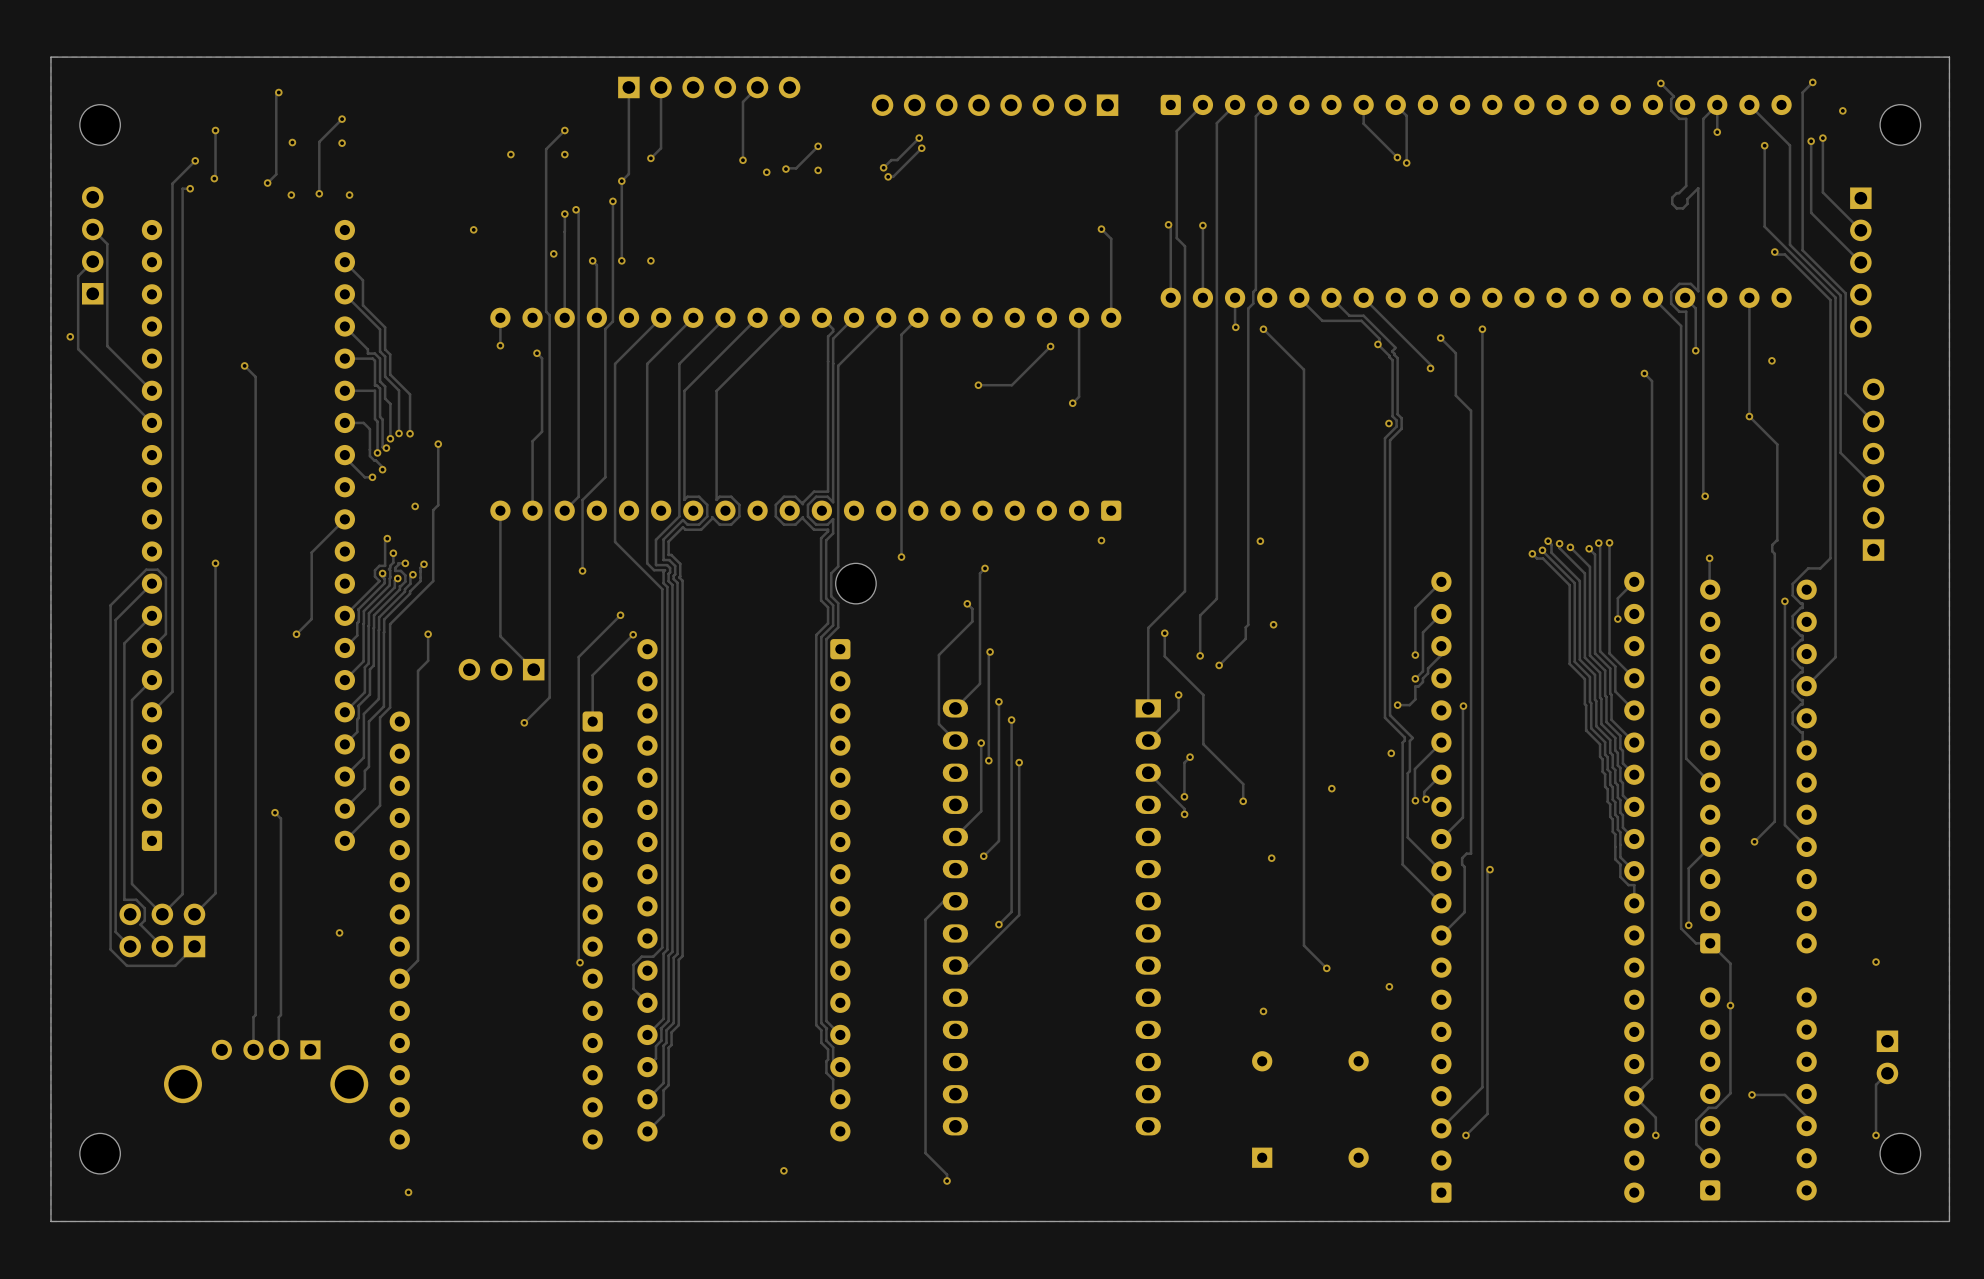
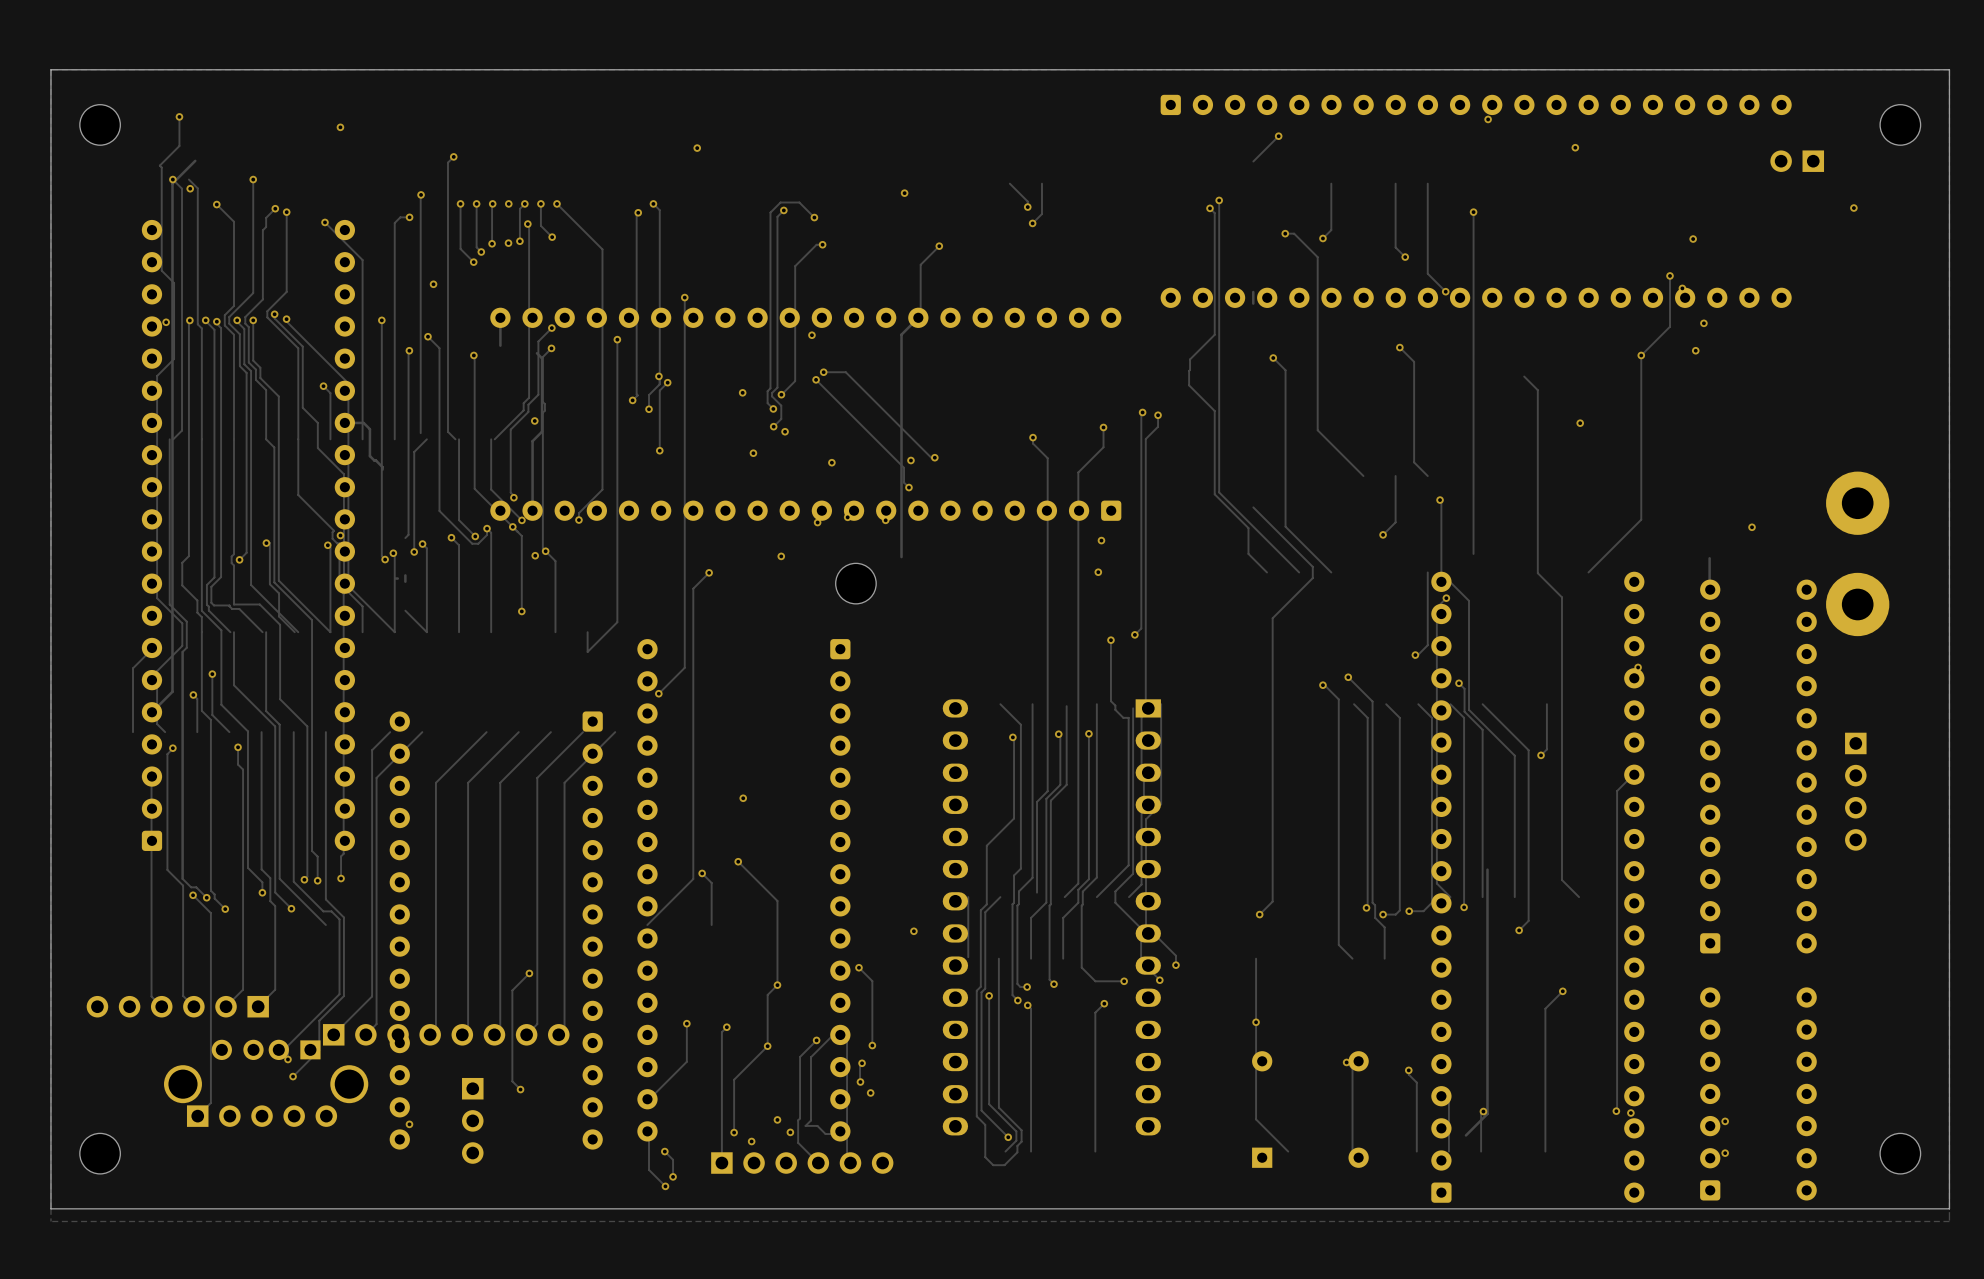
board edge: (1949, 69) (1949, 57) (50, 57) (50, 69) -> (1949, 69) (50, 69)
track: (1812, 82) (1802, 92) (1802, 250) (1845, 293) (1845, 393) (1873, 421) -> none
via: (1812, 82) -> none
track: (1660, 83) (1673, 96) (1671, 99) (1671, 110) (1679, 118) (1686, 118) (1686, 185) (1672, 197) (1672, 203) (1676, 208) (1683, 208) (1687, 203) (1687, 199) (1698, 188) (1698, 291) (1690, 283) (1679, 283) (1671, 292) (1671, 303) (1679, 311) (1686, 311) (1686, 758) (1710, 782) -> none
via: (1660, 83) -> none
track: (628, 87) (628, 174) (621, 181) (621, 260) -> none
track: (661, 87) (661, 148) (650, 158) -> none
part: (709, 87) -> none
track: (757, 87) (742, 101) (742, 160) -> none
track: (278, 92) (276, 95) (276, 174) (267, 183) -> none
via: (278, 92) -> none
track: (1202, 104) (1176, 131) (1176, 238) (1185, 246) (1185, 591) (1148, 627) (1148, 708) -> none
track: (1235, 104) (1216, 123) (1216, 598) (1200, 615) (1200, 655) -> none
track: (1267, 104) (1255, 116) (1255, 289) (1253, 292) -> none
track: (1363, 104) (1363, 123) (1397, 157) -> none
track: (1395, 104) (1406, 115) (1406, 163) -> none
track: (1749, 104) (1789, 145) (1789, 244) (1840, 295) (1840, 452) (1873, 485) -> none
part: (995, 105) -> none
via: (1842, 110) -> none
track: none -> (179, 116) (179, 146) (159, 165) (161, 167) (161, 270) (174, 283) (174, 359) (157, 376) (157, 598) (182, 623) (182, 645) (157, 671) (157, 724) (165, 732)
via: none -> (179, 116)
track: (342, 119) (319, 141) (319, 193) -> none
via: (342, 119) -> none
via: none -> (1488, 119)
via: none -> (340, 127)
track: (215, 130) (214, 178) -> none
via: (215, 130) -> none
track: (564, 130) (546, 149) (546, 311) (549, 315) (549, 697) (524, 722) -> none
via: (564, 130) -> none
track: (1717, 132) (1717, 104) (1703, 118) (1703, 494) (1705, 496) -> none
via: (1717, 132) -> none
track: none -> (1278, 136) (1253, 161)
via: none -> (1278, 136)
track: (919, 138) (897, 160) (891, 160) (883, 167) -> none
via: (919, 138) -> none
track: (1822, 138) (1822, 192) (1860, 230) -> none
via: (1822, 138) -> none
track: (1811, 141) (1811, 212) (1860, 262) -> none
via: (1811, 141) -> none
via: (292, 142) -> none
via: (342, 143) -> none
track: (1764, 145) (1764, 226) (1835, 297) (1835, 657) (1806, 686) -> none
via: (1764, 145) -> none
track: (818, 146) (796, 168) (785, 169) -> none
via: (818, 146) -> none
via: none -> (1575, 147)
via: none -> (697, 148)
track: (921, 148) (893, 176) (888, 176) -> none
via: (921, 148) -> none
via: (510, 154) -> none
via: (564, 154) -> none
track: none -> (453, 156) (447, 162) (447, 431) (455, 439)
via: none -> (453, 156)
via: (1397, 157) -> none
via: (650, 158) -> none
via: (195, 160) -> none
via: (742, 160) -> none
part: none -> (1797, 161)
via: (1406, 163) -> none
via: (883, 167) -> none
via: (785, 169) -> none
via: (818, 170) -> none
via: (766, 172) -> none
via: (888, 176) -> none
via: (214, 178) -> none
track: none -> (172, 179) (182, 188) (182, 430) (173, 439)
via: none -> (172, 179)
track: none -> (188, 179) (197, 188) (197, 324) (201, 328) (201, 610) (221, 630) (221, 704) (247, 731) (247, 867) (262, 882) (262, 892)
track: none -> (253, 179) (253, 293) (229, 317) (229, 323) (239, 334) (239, 366) (246, 372) (246, 552) (239, 559)
via: none -> (253, 179)
via: (621, 181) -> none
via: (267, 183) -> none
track: none -> (1009, 183) (1027, 201) (1027, 207)
track: none -> (1041, 183) (1041, 214) (1032, 223)
track: none -> (1331, 183) (1331, 230) (1322, 238)
track: none -> (1395, 183) (1395, 247) (1405, 257)
track: none -> (1427, 183) (1427, 273) (1445, 291)
track: (190, 188) (182, 188) (182, 651) -> (169, 439) (169, 604) (186, 621) (186, 647) (182, 651)
via: (319, 193) -> none
via: none -> (904, 193)
track: none -> (421, 194) (420, 433)
via: none -> (421, 194)
via: (291, 195) -> none
via: (349, 195) -> none
track: none -> (1219, 200) (1219, 492) (1299, 572)
via: none -> (1219, 200)
track: (612, 201) (612, 321) (605, 329) (605, 477) (582, 500) (582, 570) -> none
via: (612, 201) -> none
track: none -> (460, 203) (460, 248) (473, 262)
via: none -> (460, 203)
track: none -> (476, 203) (476, 247) (481, 252)
via: none -> (476, 203)
track: none -> (492, 203) (492, 243)
via: none -> (492, 203)
via: none -> (508, 203)
track: none -> (524, 203) (519, 208) (519, 241)
via: none -> (524, 203)
track: none -> (540, 203) (540, 225) (552, 237)
via: none -> (540, 203)
track: none -> (556, 203) (602, 249) (602, 489) (578, 513) (578, 520)
via: none -> (556, 203)
track: none -> (653, 203) (659, 210) (659, 384) (649, 395) (649, 409)
via: none -> (653, 203)
track: none -> (216, 204) (234, 221) (234, 306) (224, 315) (224, 325) (234, 334) (234, 554) (231, 556) (231, 563) (234, 565) (234, 604) (259, 604) (280, 624) (280, 699) (307, 726) (307, 876) (304, 879)
via: none -> (216, 204)
via: none -> (1027, 207)
track: none -> (275, 208) (266, 217) (266, 227) (262, 230) (262, 299) (245, 317) (245, 323) (248, 327) (248, 362) (255, 369) (255, 379) (266, 390) (266, 439) (274, 447) (274, 582) (312, 620) (312, 850) (317, 856) (317, 880)
via: none -> (275, 208)
track: none -> (1210, 208) (1214, 213) (1214, 334) (1190, 359) (1189, 385) (1214, 410) (1214, 494) (1248, 528) (1248, 553) (1267, 572)
via: none -> (1210, 208)
via: none -> (1853, 208)
track: (576, 209) (578, 212) (578, 496) (564, 510) -> none
via: (576, 209) -> none
track: none -> (783, 210) (777, 216) (777, 387) (772, 393) (772, 396) (781, 405) (781, 419) (773, 426)
via: none -> (783, 210)
track: none -> (286, 212) (286, 291) (267, 311) (267, 317) (298, 348) (298, 495) (334, 530) (332, 538) (339, 543) (339, 589) (343, 593) (343, 853) (341, 856) (341, 878)
via: none -> (286, 212)
track: none -> (638, 212) (636, 214) (637, 395) (632, 400)
via: none -> (638, 212)
track: none -> (1473, 212) (1473, 553)
via: none -> (1473, 212)
track: (564, 214) (564, 231) -> none
via: (564, 214) -> none
track: none -> (409, 217) (400, 217) (394, 222) (394, 439)
via: none -> (409, 217)
track: none -> (814, 217) (799, 202) (780, 202) (770, 212) (770, 388) (767, 391) (767, 403) (773, 408)
via: none -> (814, 217)
track: none -> (325, 222) (362, 260) (362, 439)
via: none -> (325, 222)
via: none -> (1032, 223)
track: none -> (527, 224) (529, 397) (523, 403) (523, 410) (494, 439)
via: none -> (527, 224)
track: (1168, 224) (1170, 227) (1170, 297) -> none
via: (1168, 224) -> none
track: (1202, 225) (1202, 297) -> none
via: (1202, 225) -> none
track: (92, 229) (107, 244) (107, 346) (151, 390) -> none
via: (473, 229) -> none
track: (1101, 229) (1111, 238) (1111, 317) -> none
via: (1101, 229) -> none
track: (564, 231) (564, 317) -> none
track: none -> (1285, 233) (1294, 233) (1317, 257) (1317, 430) (1363, 476)
via: none -> (1285, 233)
via: none -> (552, 237)
via: none -> (1322, 238)
via: none -> (1693, 239)
via: none -> (519, 241)
via: none -> (492, 243)
via: none -> (508, 243)
track: none -> (822, 244) (816, 244) (795, 266) (795, 381) (781, 394)
via: none -> (822, 244)
part: (92, 245) -> none
track: none -> (939, 246) (920, 264) (920, 310)
via: none -> (939, 246)
via: none -> (481, 252)
track: (1774, 252) (1777, 254) (1784, 254) (1830, 300) (1830, 558) (1820, 568) (1808, 568) (1792, 583) (1792, 595) (1802, 603) (1802, 607) (1792, 616) (1792, 627) (1802, 635) (1802, 640) (1792, 648) (1792, 659) (1802, 667) (1802, 672) (1792, 680) (1792, 691) (1802, 700) (1802, 704) (1792, 712) (1792, 724) (1802, 732) (1802, 746) (1806, 750) -> none
via: (1774, 252) -> none
via: (553, 253) -> none
via: none -> (1405, 257)
track: (592, 260) (596, 265) (596, 317) -> none
via: (592, 260) -> none
via: (621, 260) -> none
via: (650, 260) -> none
track: (92, 261) (78, 276) (78, 349) (151, 422) -> none
track: (344, 262) (362, 280) (362, 305) (385, 327) (385, 349) (390, 354) (390, 374) (410, 394) (410, 433) -> none
via: none -> (473, 262)
part: (1860, 262) -> none
track: none -> (1670, 275) (1670, 326) (1641, 355) (1641, 519) (1588, 572)
via: none -> (1670, 275)
via: none -> (433, 284)
via: none -> (1682, 288)
via: none -> (1445, 291)
track: (344, 294) (380, 329) (380, 351) (385, 356) (385, 376) (399, 390) (399, 433) -> none
track: none -> (684, 297) (684, 667) (658, 693)
via: none -> (684, 297)
track: (1235, 297) (1235, 327) -> none
track: (1299, 297) (1322, 320) (1361, 320) (1379, 338) (1377, 344) (1392, 360) (1392, 416) (1396, 420) (1396, 426) (1384, 438) (1384, 717) (1404, 737) (1402, 742) (1402, 864) (1441, 903) -> none
track: (1331, 297) (1349, 315) (1363, 315) (1395, 347) (1392, 351) (1397, 358) (1397, 414) (1401, 418) (1401, 428) (1390, 440) (1390, 715) (1412, 738) (1409, 740) (1409, 771) (1407, 773) (1407, 837) (1441, 871) -> none
track: (1363, 297) (1432, 366) (1430, 368) -> none
track: (1652, 297) (1681, 325) (1681, 928) (1695, 943) (1710, 943) (1730, 963) (1730, 1093) (1715, 1107) (1708, 1107) (1696, 1120) (1696, 1144) (1710, 1158) -> none
track: (1685, 297) (1695, 308) (1695, 350) -> none
track: (1749, 297) (1749, 416) (1777, 444) (1777, 540) (1772, 545) (1772, 551) (1774, 553) (1774, 821) (1754, 841) -> none
track: (1253, 303) (1248, 308) (1248, 624) (1245, 627) (1245, 638) (1219, 665) -> none
track: none -> (274, 314) (274, 318) (302, 346) (302, 407) (317, 422) (317, 448) (343, 474) (343, 587) (362, 606) (362, 632)
via: none -> (274, 314)
track: (661, 317) (615, 363) (615, 541) (662, 589) (662, 947) (653, 956) (641, 956) (633, 964) (633, 988) (647, 1002) -> none
track: (693, 317) (647, 363) (647, 563) (654, 570) (665, 570) (663, 583) (667, 587) (667, 949) (663, 953) (663, 1018) (647, 1034) -> none
track: (725, 317) (679, 363) (679, 516) (655, 539) (655, 564) (667, 565) (670, 568) (668, 581) (672, 584) (672, 951) (668, 955) (668, 1020) (660, 1028) (661, 1040) (655, 1046) (655, 1058) (647, 1067) -> none
track: (757, 317) (684, 390) (684, 499) (687, 496) (699, 496) (707, 504) (707, 516) (699, 524) (687, 524) (682, 520) (663, 539) (663, 560) (669, 560) (675, 565) (673, 579) (677, 582) (677, 953) (673, 957) (673, 1023) (666, 1030) (666, 1042) (663, 1045) (663, 1083) (647, 1099) -> none
track: (789, 317) (716, 390) (716, 499) (719, 496) (731, 496) (739, 504) (739, 516) (731, 524) (719, 524) (712, 517) (701, 529) (685, 529) (682, 527) (668, 541) (668, 554) (671, 554) (680, 563) (679, 577) (682, 580) (682, 956) (678, 959) (678, 1025) (671, 1032) (671, 1044) (668, 1047) (668, 1085) (663, 1090) (663, 1115) (647, 1131) -> none
track: (821, 317) (833, 329) (828, 336) (828, 491) (814, 491) (802, 504) (795, 496) (783, 496) (775, 504) (775, 516) (783, 524) (795, 524) (802, 517) (814, 529) (828, 529) (821, 538) (821, 600) (828, 607) (828, 623) (816, 635) (816, 1025) (821, 1030) (821, 1042) (828, 1049) (826, 1072) (833, 1079) (833, 1092) (840, 1099) -> none
track: (854, 317) (833, 338) (833, 502) (827, 496) (816, 496) (807, 504) (807, 516) (816, 524) (827, 524) (833, 519) (833, 533) (826, 540) (826, 598) (833, 605) (833, 625) (821, 637) (821, 1023) (826, 1028) (826, 1040) (833, 1047) (833, 1059) (840, 1067) -> none
track: (886, 317) (838, 365) (838, 566) (831, 573) (831, 596) (838, 603) (838, 627) (826, 639) (826, 1021) (840, 1034) -> none
track: (1079, 317) (1079, 396) (1072, 403) -> none
track: none -> (286, 319) (286, 321) (348, 383) (348, 585) (394, 632) (395, 551)
via: none -> (286, 319)
track: none -> (189, 320) (188, 556) (182, 562) (182, 585) (197, 600) (197, 612) (201, 617) (201, 710) (210, 719) (210, 890) (214, 894) (214, 898) (225, 909)
via: none -> (189, 320)
track: none -> (205, 320) (214, 329) (214, 577) (206, 584) (206, 604) (208, 610) (230, 632)
via: none -> (205, 320)
track: none -> (237, 320) (244, 328) (244, 364) (251, 371) (251, 584) (298, 632)
via: none -> (237, 320)
track: none -> (253, 320) (253, 360) (260, 367) (260, 378) (278, 396) (278, 580) (330, 632) (330, 547) (327, 545)
via: none -> (253, 320)
track: none -> (381, 320) (381, 556) (385, 559)
via: none -> (381, 320)
track: none -> (216, 321) (221, 328) (221, 577) (211, 586) (211, 602) (213, 605) (229, 605) (232, 608) (239, 608) (262, 632)
via: none -> (216, 321)
via: none -> (166, 322)
via: none -> (1703, 323)
track: (344, 326) (367, 349) (367, 353) (374, 353) (380, 358) (380, 381) (385, 386) (385, 398) (390, 403) (390, 438) -> none
via: (1235, 327) -> none
track: none -> (551, 328) (538, 341) (538, 394) (528, 404) (528, 411) (510, 429) (510, 492) (513, 497)
via: none -> (551, 328)
track: (1263, 329) (1303, 369) (1303, 945) (1326, 968) -> none
via: (1263, 329) -> none
track: (1482, 329) (1482, 1087) (1441, 1128) -> none
via: (1482, 329) -> none
via: none -> (811, 335)
via: (70, 336) -> none
track: none -> (427, 336) (439, 348) (439, 510) (472, 543) (478, 543) (487, 535) (487, 528) (491, 532) (491, 632)
via: none -> (427, 336)
track: (1440, 338) (1455, 353) (1455, 395) (1471, 410) (1471, 853) (1466, 853) (1462, 858) (1462, 864) (1464, 867) (1464, 912) (1441, 935) -> none
via: (1440, 338) -> none
track: none -> (617, 339) (617, 622) (587, 651) (587, 632)
via: none -> (617, 339)
via: (1377, 344) -> none
via: (500, 345) -> none
track: (1050, 346) (1011, 385) (978, 385) -> none
via: (1050, 346) -> none
track: none -> (1399, 347) (1414, 361) (1414, 462) (1427, 476)
via: none -> (1399, 347)
track: none -> (551, 348) (542, 357) (542, 402) (544, 404) (544, 410) (542, 412) (542, 548) (555, 561) (555, 632)
via: none -> (551, 348)
track: none -> (409, 350) (408, 534) (405, 538)
via: none -> (409, 350)
via: (536, 353) -> none
track: none -> (473, 355) (474, 488) (521, 535) (521, 611)
via: none -> (473, 355)
track: (344, 358) (372, 358) (374, 360) (374, 385) (380, 388) (382, 447) (386, 448) -> none
track: none -> (1273, 358) (1285, 370) (1285, 526) (1331, 572)
via: none -> (1273, 358)
via: (1771, 360) -> none
track: (244, 365) (255, 376) (255, 1015) (253, 1017) (253, 1049) -> none
via: (244, 365) -> none
via: (1430, 368) -> none
track: none -> (823, 372) (845, 372) (931, 458) (934, 457)
via: none -> (823, 372)
track: (1644, 373) (1652, 381) (1652, 1078) (1634, 1096) (1655, 1117) (1655, 1135) -> none
via position: (1644, 373) -> (1641, 355)
via: none -> (658, 376)
track: none -> (1524, 376) (1537, 390) (1537, 573) (1561, 597) (1561, 880) (1579, 897)
track: none -> (816, 379) (904, 467) (904, 482) (908, 487)
via: none -> (816, 379)
track: none -> (667, 382) (659, 390) (659, 450)
via: none -> (667, 382)
via: (978, 385) -> none
track: none -> (323, 386) (330, 393) (330, 439)
via: none -> (323, 386)
track: (344, 390) (374, 390) (377, 452) -> none
via: none -> (742, 392)
via: none -> (781, 394)
via: none -> (632, 400)
via: (1072, 403) -> none
via: none -> (773, 408)
via: none -> (649, 409)
track: none -> (1142, 412) (1141, 628) (1134, 634)
via: none -> (1142, 412)
track: none -> (1158, 415) (1158, 426) (1145, 439) (1145, 713) (1141, 717) (1141, 764) (1143, 767) (1141, 884) (1129, 897)
via: none -> (1158, 415)
via: (1749, 416) -> none
via: none -> (534, 420)
via: (1388, 423) -> none
via: none -> (1580, 423)
via: none -> (773, 426)
track: none -> (1103, 427) (1103, 447) (1078, 472) (1078, 883) (1064, 897)
via: none -> (1103, 427)
via: none -> (785, 431)
via: (399, 433) -> none
via: (410, 433) -> none
track: none -> (1033, 437) (1033, 443) (1047, 458) (1047, 791) (1037, 801) (1037, 892)
via: none -> (1033, 437)
via: (390, 438) -> none
track: none -> (426, 439) (414, 451) (414, 551)
track: none -> (459, 439) (459, 520) (475, 536)
track: none -> (491, 439) (491, 489) (521, 520)
track: (438, 444) (438, 505) (433, 510) (433, 581) (390, 624) (390, 707) (380, 717) (380, 805) (344, 840) -> none
via: (438, 444) -> none
via: (386, 448) -> none
via: none -> (659, 450)
via: (377, 452) -> none
via: none -> (753, 453)
track: (344, 455) (364, 477) (372, 477) -> none
via: none -> (934, 457)
via: none -> (910, 460)
via: none -> (831, 462)
via: (382, 469) -> none
part: (1873, 469) -> none
track: none -> (1395, 476) (1395, 522) (1383, 534)
via: (372, 477) -> none
via: none -> (908, 487)
via: (1705, 496) -> none
via: none -> (513, 497)
track: none -> (1440, 500) (1441, 573) (1469, 600) (1469, 709) (1514, 755) (1514, 897)
via: none -> (1440, 500)
part: none -> (1857, 503)
via: (415, 506) -> none
track: none -> (1253, 507) (1312, 566) (1312, 578) (1272, 618) (1272, 901) (1259, 914)
track: (500, 510) (500, 636) (533, 669) -> none
via: none -> (847, 517)
track: (344, 519) (311, 552) (311, 619) (296, 634) -> none
via: none -> (521, 520)
via: none -> (578, 520)
via: none -> (885, 520)
via: none -> (817, 522)
via: none -> (512, 526)
via: none -> (1752, 527)
via: none -> (487, 528)
via: none -> (1383, 534)
via: none -> (340, 535)
via: none -> (475, 536)
track: none -> (451, 537) (459, 545) (459, 632)
via: none -> (451, 537)
track: (387, 538) (385, 540) (385, 565) (379, 565) (374, 570) (374, 576) (379, 581) -> none
via: (387, 538) -> none
via: (1260, 541) -> none
track: (1548, 541) (1551, 544) (1551, 552) (1579, 581) (1579, 659) (1595, 674) (1596, 726) (1610, 740) (1610, 752) (1612, 755) (1612, 767) (1615, 770) (1615, 782) (1617, 785) (1620, 812) (1622, 815) (1622, 827) (1634, 839) -> none
via: (1548, 541) -> none
track: (1609, 542) (1609, 653) (1634, 678) -> none
via: (1609, 542) -> none
track: none -> (266, 543) (269, 543) (269, 584) (279, 593) (279, 616) (294, 632)
via: none -> (266, 543)
track: (1559, 543) (1559, 548) (1584, 573) (1584, 657) (1600, 672) (1601, 724) (1615, 738) (1615, 750) (1617, 753) (1622, 795) (1634, 806) -> none
via: (1559, 543) -> none
track: (1598, 543) (1600, 651) (1615, 666) (1615, 691) (1634, 710) -> none
via: (1598, 543) -> none
track: none -> (422, 544) (426, 548) (426, 632) (405, 610)
via: none -> (422, 544)
via: none -> (327, 545)
track: (1570, 547) (1589, 566) (1589, 655) (1605, 670) (1606, 721) (1620, 735) (1622, 763) (1634, 774) -> none
via: (1570, 547) -> none
track: (1589, 548) (1595, 554) (1595, 653) (1610, 668) (1611, 719) (1634, 742) -> none
via: (1589, 548) -> none
track: (1542, 550) (1574, 583) (1574, 661) (1589, 677) (1591, 728) (1605, 742) (1610, 784) (1612, 787) (1612, 799) (1615, 802) (1615, 814) (1617, 817) (1617, 829) (1620, 832) (1620, 857) (1634, 871) -> none
via: (1542, 550) -> none
via: none -> (414, 551)
via: none -> (545, 551)
track: (393, 553) (393, 562) (389, 569) (389, 585) (363, 611) (363, 661) (344, 680) -> none
track: (1532, 553) (1537, 558) (1543, 558) (1569, 585) (1569, 663) (1584, 679) (1586, 730) -> none
via: (1532, 553) -> none
via: none -> (535, 555)
via: none -> (781, 556)
via: (901, 557) -> none
via: (1709, 558) -> none
via: none -> (385, 559)
track: (215, 563) (215, 893) (194, 914) -> none
via position: (215, 563) -> (239, 559)
track: (405, 563) (398, 563) (395, 570) (400, 570) (405, 575) -> none
via: (405, 563) -> none
track: (424, 564) (420, 567) (420, 581) (384, 619) (383, 706) (368, 721) (368, 766) (364, 770) (364, 788) (344, 808) -> none
via: (424, 564) -> none
track: (985, 568) (979, 573) (979, 683) (955, 708) -> none
via: (985, 568) -> none
via: (582, 570) -> none
track: none -> (709, 572) (693, 588) (693, 879) (647, 925)
via: none -> (709, 572)
via: none -> (1098, 572)
track: none -> (1427, 572) (1427, 645) (1414, 658)
track: (382, 573) (385, 576) (382, 576) (384, 583) (358, 609) (357, 635) (344, 647) -> none
via: (382, 573) -> none
track: (412, 574) (410, 577) (410, 583) (404, 591) (379, 617) (378, 699) (363, 713) (363, 757) (344, 776) -> none
via: (412, 574) -> none
track: (395, 578) (394, 587) (368, 613) (368, 663) (364, 667) (364, 692) (344, 712) -> none
via: (397, 578) -> none
track: (379, 581) (344, 615) -> none
track: (405, 581) (374, 615) (373, 665) (369, 669) (369, 694) (358, 705) (357, 732) (344, 744) -> none
track: (1441, 581) (1415, 607) (1415, 655) -> none
track: (1634, 581) (1617, 598) (1617, 619) -> none
track: (151, 583) (115, 620) (115, 931) (130, 946) -> none
track: none -> (1446, 598) (1436, 607) (1436, 883) (1450, 897)
via: none -> (1446, 598)
track: (1784, 601) (1784, 825) (1806, 846) -> none
via: (1784, 601) -> none
track: (967, 603) (972, 608) (972, 621) (938, 655) (938, 724) (955, 740) -> none
via: (967, 603) -> none
part: none -> (1857, 604)
via: none -> (521, 611)
track: (1441, 613) (1422, 632) (1422, 671) (1415, 678) -> none
track: (151, 615) (124, 643) (124, 899) (136, 899) (144, 908) (144, 920) (140, 924) (162, 946) -> none
track: (620, 615) (578, 657) (580, 962) -> none
via: (620, 615) -> none
via position: (1617, 619) -> (1638, 667)
via: (1273, 624) -> none
track: none -> (234, 632) (234, 685) (275, 726) (275, 892) (291, 908)
track: none -> (266, 632) (266, 711) (279, 724) (279, 878) (325, 925)
track: (1164, 633) (1164, 656) (1203, 694) (1203, 744) (1243, 784) (1243, 801) -> none
via: (1164, 633) -> none
via: (296, 634) -> none
track: (428, 634) (428, 660) (418, 670) (418, 960) (399, 978) -> none
via: (428, 634) -> none
track: (633, 634) (592, 675) (592, 721) -> none
via: (633, 634) -> none
via: none -> (1134, 634)
track: none -> (1110, 640) (1110, 701) (1115, 705) (1115, 709) (1123, 717) (1128, 717) (1128, 865) (1096, 897)
via: none -> (1110, 640)
track: (1441, 646) (1441, 655) (1428, 668) (1428, 673) (1422, 678) (1422, 682) (1418, 686) (1415, 686) (1415, 699) (1409, 705) (1397, 705) -> none
track: (151, 647) (165, 634) (165, 577) (157, 569) (146, 569) (110, 605) (110, 949) (126, 965) (175, 965) (194, 946) -> none
track: (990, 651) (988, 760) -> none
via: (990, 651) -> none
track: none -> (148, 652) (133, 668) (133, 732)
via: (1200, 655) -> none
via: (1219, 665) -> none
part: (501, 669) -> none
track: none -> (212, 674) (212, 715) (229, 732)
via: none -> (212, 674)
track: none -> (1348, 677) (1372, 701) (1372, 902) (1375, 905) (1375, 917) (1384, 927) (1384, 958)
via: none -> (1348, 677)
via: (1415, 678) -> none
track: (151, 680) (131, 700) (131, 884) (162, 914) (182, 894) (182, 878) -> (206, 897) (196, 887) (191, 887) (182, 878)
track: none -> (1459, 683) (1464, 688) (1464, 711) (1482, 729) (1482, 897)
via: none -> (1459, 683)
track: none -> (1322, 685) (1338, 699) (1338, 944) (1352, 958)
via: none -> (1322, 685)
via: none -> (658, 693)
track: none -> (193, 694) (197, 698) (197, 732)
via: none -> (193, 694)
track: (1178, 694) (1178, 710) (1148, 740) -> none
via: (1178, 694) -> none
track: (998, 701) (998, 841) (983, 856) -> none
via: (998, 701) -> none
track: none -> (1000, 704) (1020, 724) (1020, 868) (1014, 875) (1012, 904) (1012, 995) (1017, 1000)
track: none -> (1032, 704) (1032, 877) (1018, 891) (1017, 905) (1017, 983) (1020, 987) (1027, 987)
track: none -> (1096, 704) (1096, 877) (1082, 891) (1081, 967) (1095, 981) (1124, 981)
track: none -> (1161, 704) (1161, 804) (1146, 819) (1146, 925) (1175, 955) (1175, 965)
track: none -> (1354, 704) (1367, 717) (1366, 907)
track: none -> (1386, 704) (1399, 717) (1399, 910) (1395, 914) (1383, 914)
track: none -> (1418, 704) (1431, 717) (1431, 902) (1423, 911) (1409, 911)
track: none -> (1450, 704) (1464, 717) (1464, 907)
track: none -> (1482, 704) (1528, 750) (1528, 920) (1519, 930)
track: none -> (1546, 704) (1546, 749) (1541, 755)
via: (1397, 705) -> none
track: none -> (1066, 706) (1066, 784) (1050, 800) (1049, 979) (1054, 984)
track: (1463, 706) (1462, 817) (1441, 839) -> none
via: (1463, 706) -> none
track: none -> (1133, 708) (1133, 873) (1115, 891) (1115, 902) (1141, 928) (1141, 961) (1159, 980)
track: (1011, 720) (1011, 911) (998, 924) -> none
via: (1011, 720) -> none
via: (524, 722) -> none
track: (1586, 730) (1600, 744) (1605, 786) (1607, 789) (1607, 801) (1610, 804) (1610, 816) (1612, 819) (1612, 831) (1615, 834) (1615, 859) (1620, 864) (1620, 876) (1628, 885) (1634, 885) (1634, 903) -> none
track: none -> (261, 732) (261, 869) (270, 878) (270, 901) (275, 906) (275, 989) (258, 1006)
track: none -> (293, 732) (293, 881) (323, 911) (331, 911) (339, 919) (339, 994) (287, 1045) (287, 1059)
track: none -> (325, 732) (325, 899) (343, 917) (343, 996) (319, 1020) (319, 1050) (293, 1076)
track: none -> (390, 732) (372, 750) (372, 996) (333, 1034)
track: none -> (422, 732) (376, 777) (376, 1024) (365, 1034)
track: none -> (486, 732) (435, 782) (435, 1029)
track: none -> (518, 732) (468, 782) (468, 1029)
track: none -> (550, 732) (500, 782) (500, 1029)
track: none -> (583, 732) (537, 777) (537, 1024) (526, 1034)
track: none -> (615, 732) (564, 782) (564, 1029)
track: none -> (1088, 733) (1088, 879) (1078, 889) (1078, 902) (1063, 917) (1063, 958)
via: none -> (1088, 733)
track: none -> (1058, 734) (1060, 735) (1060, 784) (1046, 798) (1046, 902) (1031, 917) (1031, 958)
via: none -> (1058, 734)
track: none -> (1012, 737) (1014, 818) (986, 845) (986, 904) (980, 910) (980, 986) (976, 990) (976, 1116) (985, 1124) (985, 1157) (993, 1165) (1004, 1165) (1017, 1152) (1017, 1145) (1021, 1141) (1021, 1130) (998, 1107) (998, 958)
via: none -> (1012, 737)
track: (1441, 742) (1414, 769) (1414, 800) -> none
track: (981, 743) (981, 811) (955, 837) -> none
via: (981, 743) -> none
track: none -> (238, 747) (238, 764) (243, 769) (243, 989) (226, 1006)
via: none -> (238, 747)
track: none -> (172, 748) (167, 754) (167, 869) (183, 885) (183, 995) (193, 1006)
via: none -> (172, 748)
via: (1391, 753) -> none
via: none -> (1541, 755)
track: (1190, 757) (1184, 762) (1184, 796) -> none
via: (1190, 757) -> none
via: (988, 760) -> none
track: (1019, 762) (1019, 915) (968, 965) (955, 965) -> none
via: (1019, 762) -> none
track: (1148, 772) (1184, 809) (1184, 814) -> none
track: none -> (151, 773) (151, 996) (161, 1006)
track: (1441, 774) (1424, 791) (1425, 799) -> none
track: none -> (1629, 778) (1617, 791) (1616, 1111)
via: (1331, 788) -> none
part: none -> (1855, 791)
via: (1184, 796) -> none
via: none -> (743, 798)
via: (1426, 799) -> none
via: (1415, 800) -> none
via: (1243, 801) -> none
track: (275, 812) (280, 818) (280, 1015) (278, 1017) (278, 1049) -> none
via: (275, 812) -> none
via: (1184, 814) -> none
via: (1754, 841) -> none
track: (1710, 846) (1688, 868) (1688, 925) -> none
via: (983, 856) -> none
via: (1271, 858) -> none
track: none -> (738, 861) (777, 900) (777, 985) (767, 994) (767, 1046) (734, 1079) (734, 1132)
via: none -> (738, 861)
via: (1490, 869) -> none
track: none -> (702, 873) (711, 882) (711, 925)
via: none -> (702, 873)
via: none -> (341, 878)
via: none -> (304, 879)
via: none -> (317, 880)
via: none -> (262, 892)
track: none -> (193, 895) (210, 913) (210, 1102) (197, 1116)
via: none -> (193, 895)
via: none -> (206, 897)
track: none -> (968, 897) (968, 957)
track: none -> (1000, 897) (985, 912) (985, 988) (981, 992) (981, 1110) (1008, 1137)
track: (955, 901) (943, 901) (925, 919) (925, 1153) (947, 1174) (947, 1180) -> none
via: none -> (1366, 907)
via: none -> (1464, 907)
via: none -> (291, 908)
via: none -> (225, 909)
via: none -> (1409, 911)
via: none -> (1259, 914)
via: none -> (1383, 914)
via: (998, 924) -> none
via: (1688, 925) -> none
part: (162, 930) -> none
via: none -> (1519, 930)
via: none -> (913, 931)
via: (339, 932) -> none
track: none -> (1256, 958) (1256, 1119) (1288, 1151)
via position: (580, 962) -> (529, 973)
via: (1876, 962) -> none
via: none -> (1175, 965)
track: none -> (858, 967) (872, 981) (872, 1045)
via: none -> (858, 967)
via: (1326, 968) -> none
track: none -> (529, 973) (512, 990) (512, 1081) (520, 1089)
via: none -> (1159, 980)
via: none -> (1124, 981)
via: none -> (1054, 984)
via: none -> (777, 985)
via: (1389, 986) -> none
via: none -> (1027, 987)
track: none -> (1562, 991) (1545, 1008) (1545, 1151)
via: none -> (1562, 991)
track: none -> (989, 995) (989, 1104) (1016, 1131) (1016, 1140) (1005, 1151)
via: none -> (989, 995)
via: none -> (1017, 1000)
track: none -> (1104, 1003) (1095, 1012) (1095, 1151)
via: none -> (1104, 1003)
track: none -> (1027, 1005) (1031, 1008) (1031, 1151)
via: none -> (1027, 1005)
via: (1730, 1005) -> none
part: none -> (177, 1006)
via position: (1263, 1011) -> (1256, 1022)
track: none -> (686, 1023) (686, 1061) (649, 1099)
via: none -> (686, 1023)
track: none -> (726, 1027) (721, 1032) (721, 1163)
via: none -> (726, 1027)
track: none -> (837, 1029) (810, 1057) (810, 1120) (805, 1125) (817, 1125) (825, 1134) (835, 1134)
track: none -> (847, 1030) (847, 1159)
part: none -> (446, 1034)
track: none -> (816, 1040) (800, 1056) (798, 1142) (818, 1163)
via: none -> (816, 1040)
via: none -> (872, 1045)
via: none -> (767, 1046)
part: (1887, 1057) -> none
via: none -> (287, 1059)
track: none -> (1346, 1062) (1352, 1068) (1352, 1151)
via: none -> (1346, 1062)
track: none -> (862, 1063) (860, 1065) (860, 1082)
via: none -> (862, 1063)
track: none -> (1408, 1070) (1408, 1074) (1416, 1082) (1416, 1151)
via: none -> (1408, 1070)
track: (1887, 1073) (1876, 1084) (1876, 1135) -> none
via: none -> (293, 1076)
via: none -> (860, 1082)
via: none -> (520, 1089)
via: none -> (870, 1092)
track: none -> (1446, 1094) (1448, 1097) (1448, 1151)
track: (1752, 1094) (1784, 1094) (1806, 1116) (1806, 1126) -> none
via: (1752, 1094) -> none
track: none -> (1483, 1111) (1481, 1113) (1481, 1151)
via: none -> (1616, 1111)
via: none -> (1630, 1113)
part: none -> (262, 1116)
via: none -> (777, 1119)
part: none -> (472, 1120)
via: none -> (1725, 1121)
track: none -> (649, 1131) (649, 1169) (665, 1186)
via: none -> (734, 1132)
via: none -> (790, 1132)
via position: (1465, 1135) -> (1483, 1111)
via: (1655, 1135) -> none
via: (1876, 1135) -> none
via: none -> (1008, 1137)
via: none -> (751, 1141)
track: none -> (664, 1151) (673, 1159) (673, 1176)
via: none -> (664, 1151)
via: none -> (1725, 1153)
part: none -> (802, 1163)
via: (783, 1170) -> none
via: none -> (673, 1176)
via: (947, 1180) -> none
via: none -> (665, 1186)
via position: (408, 1192) -> (409, 1124)
board edge: (1949, 1208) (1949, 1221) (50, 1221) (50, 1208) -> (1949, 1208) (50, 1208)

